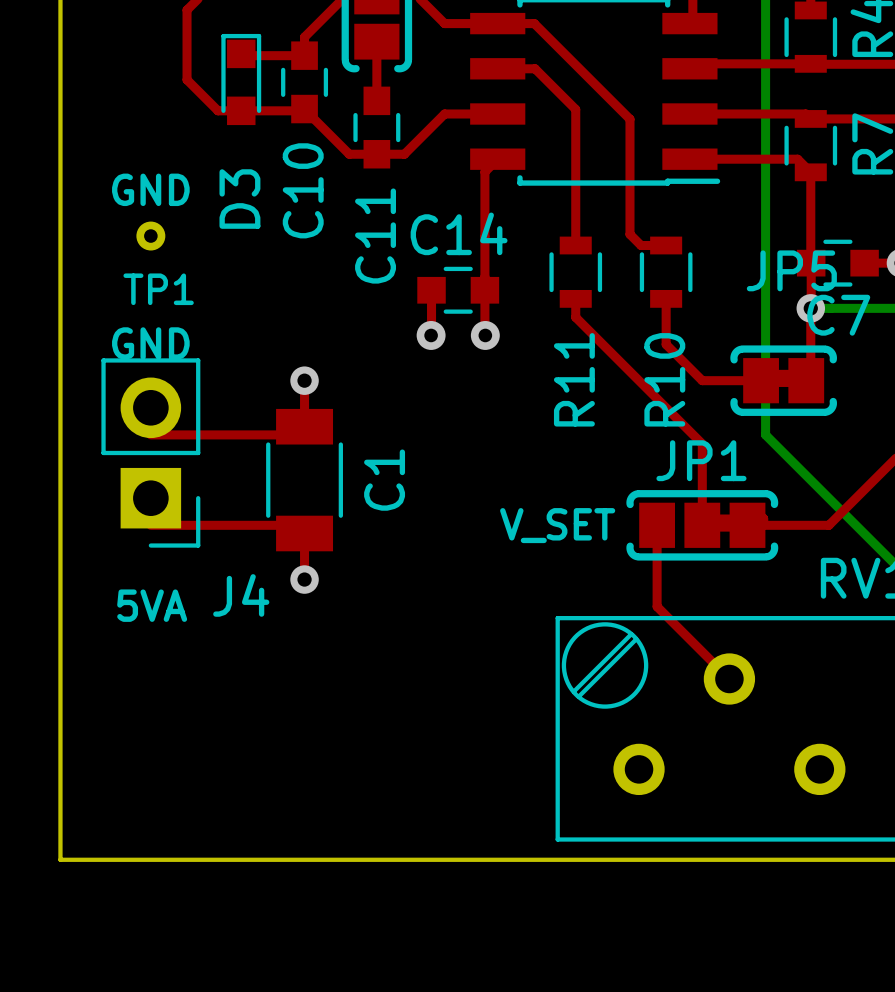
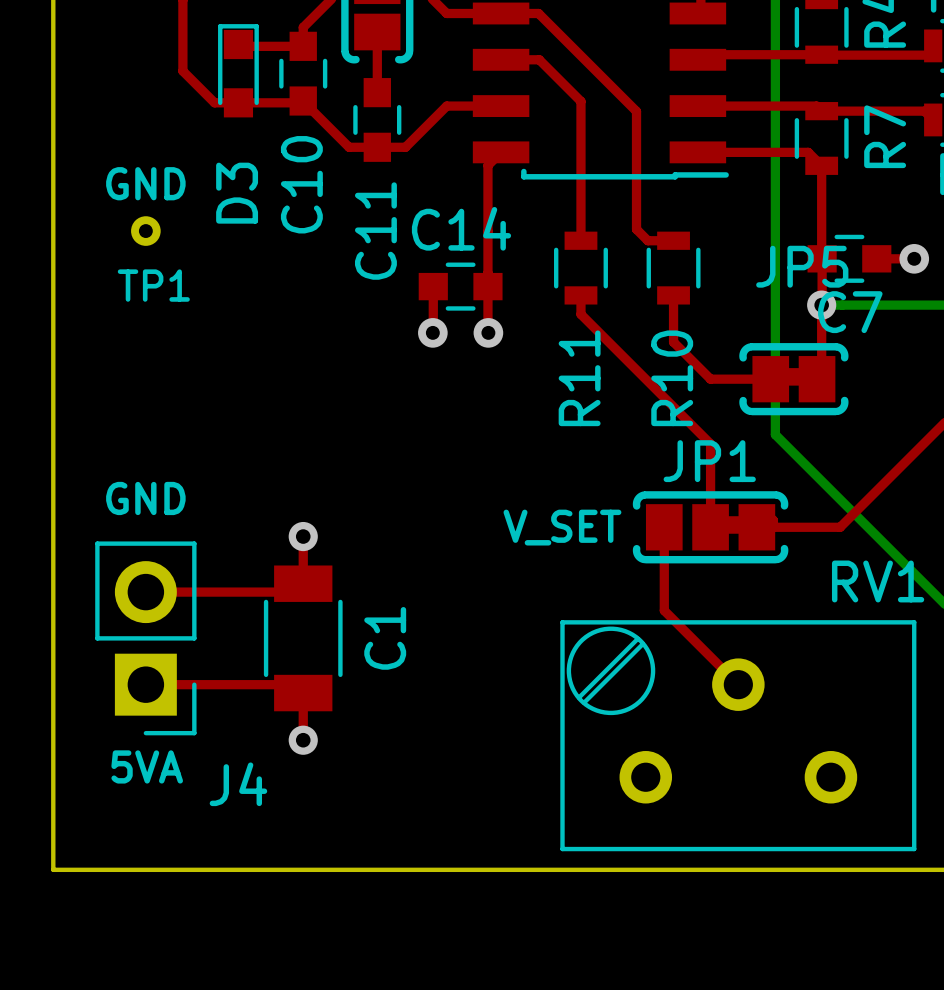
text position: GND (150, 343) -> GND (145, 498)
top track: (304, 380) (304, 426) (296, 434) (150, 434) -> none
via: (304, 380) -> none
J4 position: (150, 452) -> (145, 638)
C1 position: (304, 480) -> (303, 638)
top track: (150, 525) (296, 525) (304, 534) -> none
top track: none -> (303, 582) (294, 592) (145, 592)
via position: (304, 579) -> (303, 536)
text position: 5VA (152, 605) -> 5VA (147, 766)
top track: none -> (145, 684) (294, 684) (303, 693) (303, 740)
via: none -> (303, 740)

